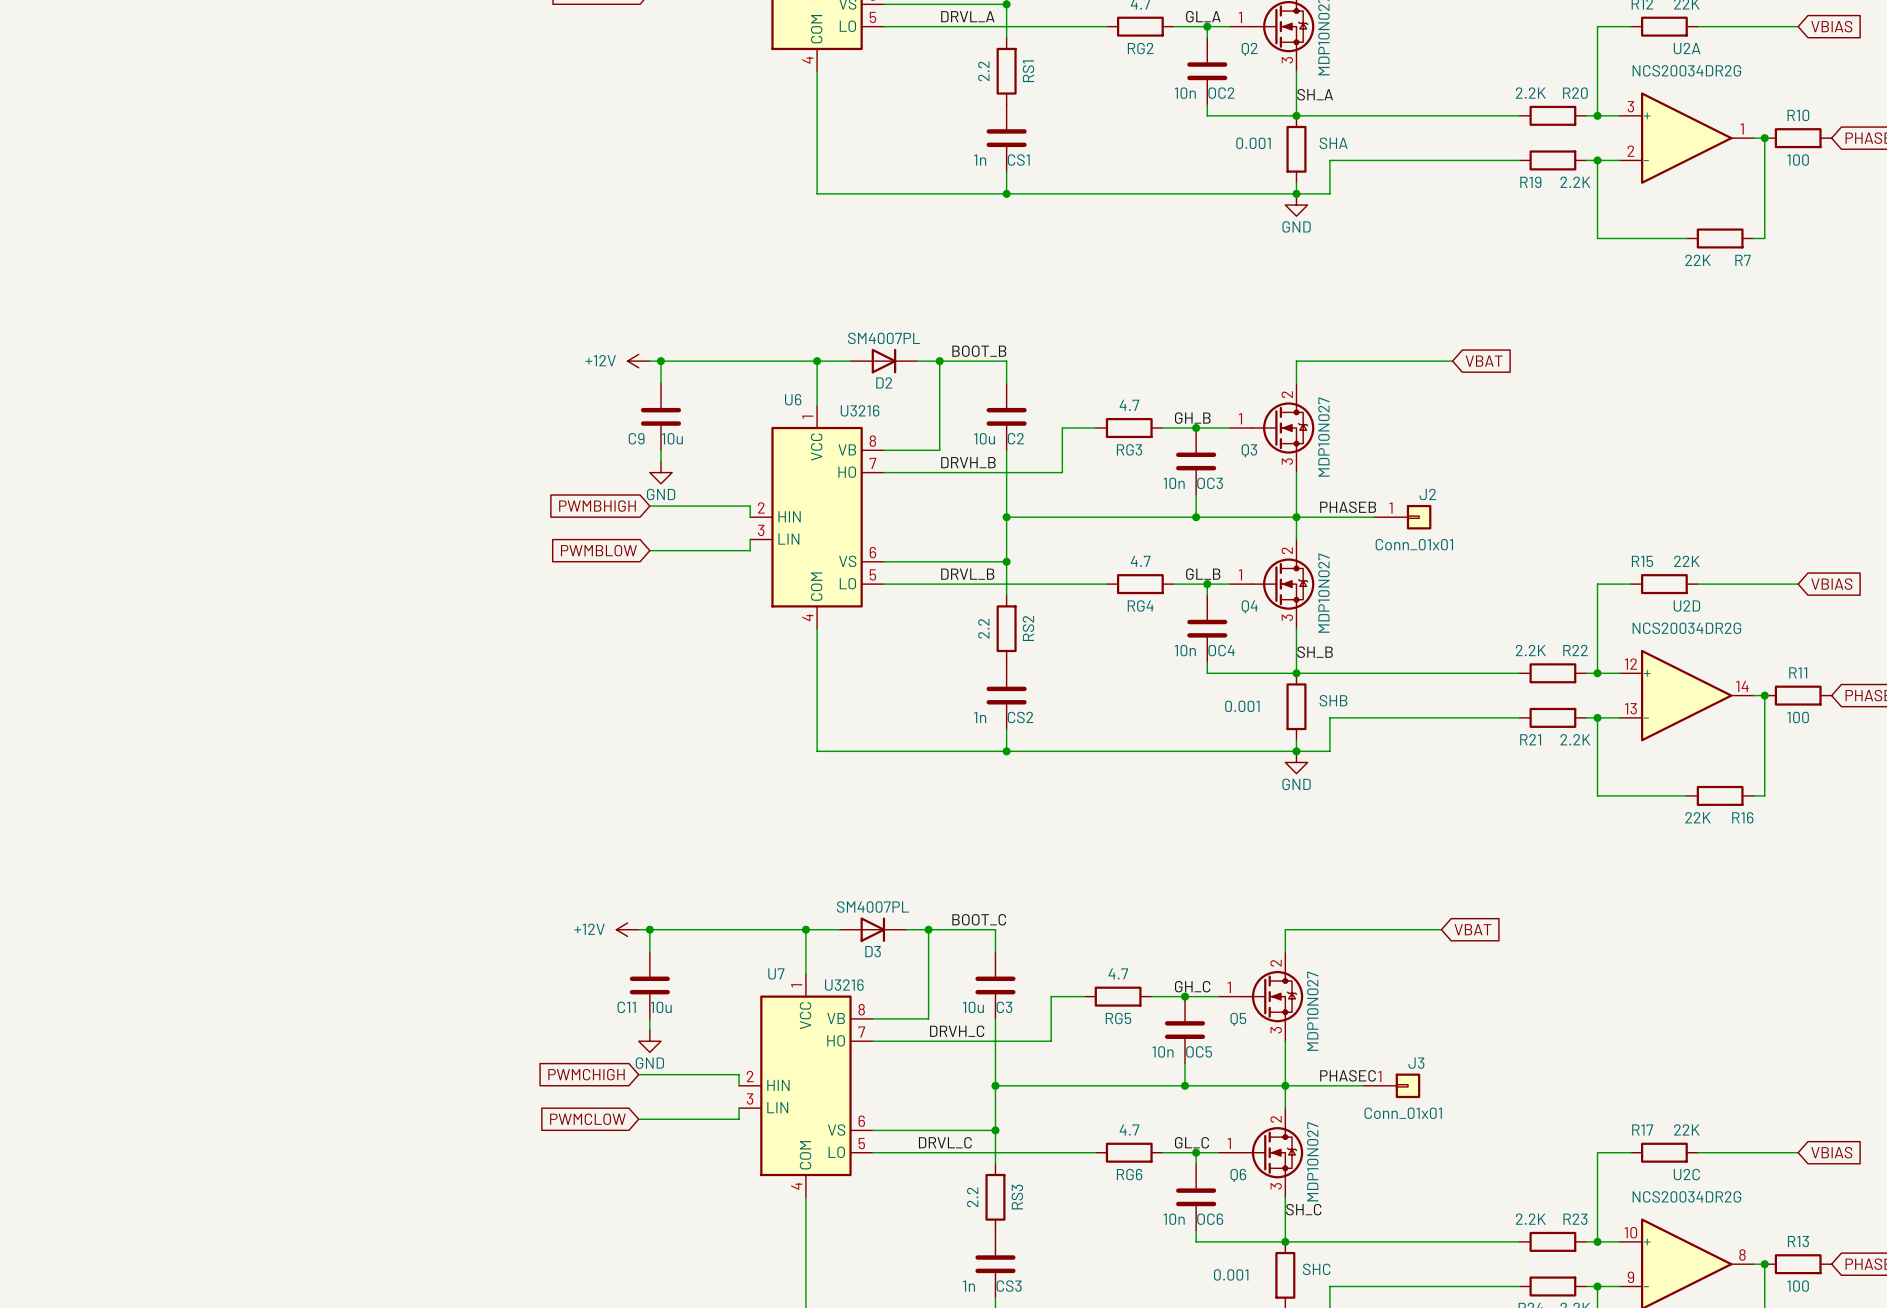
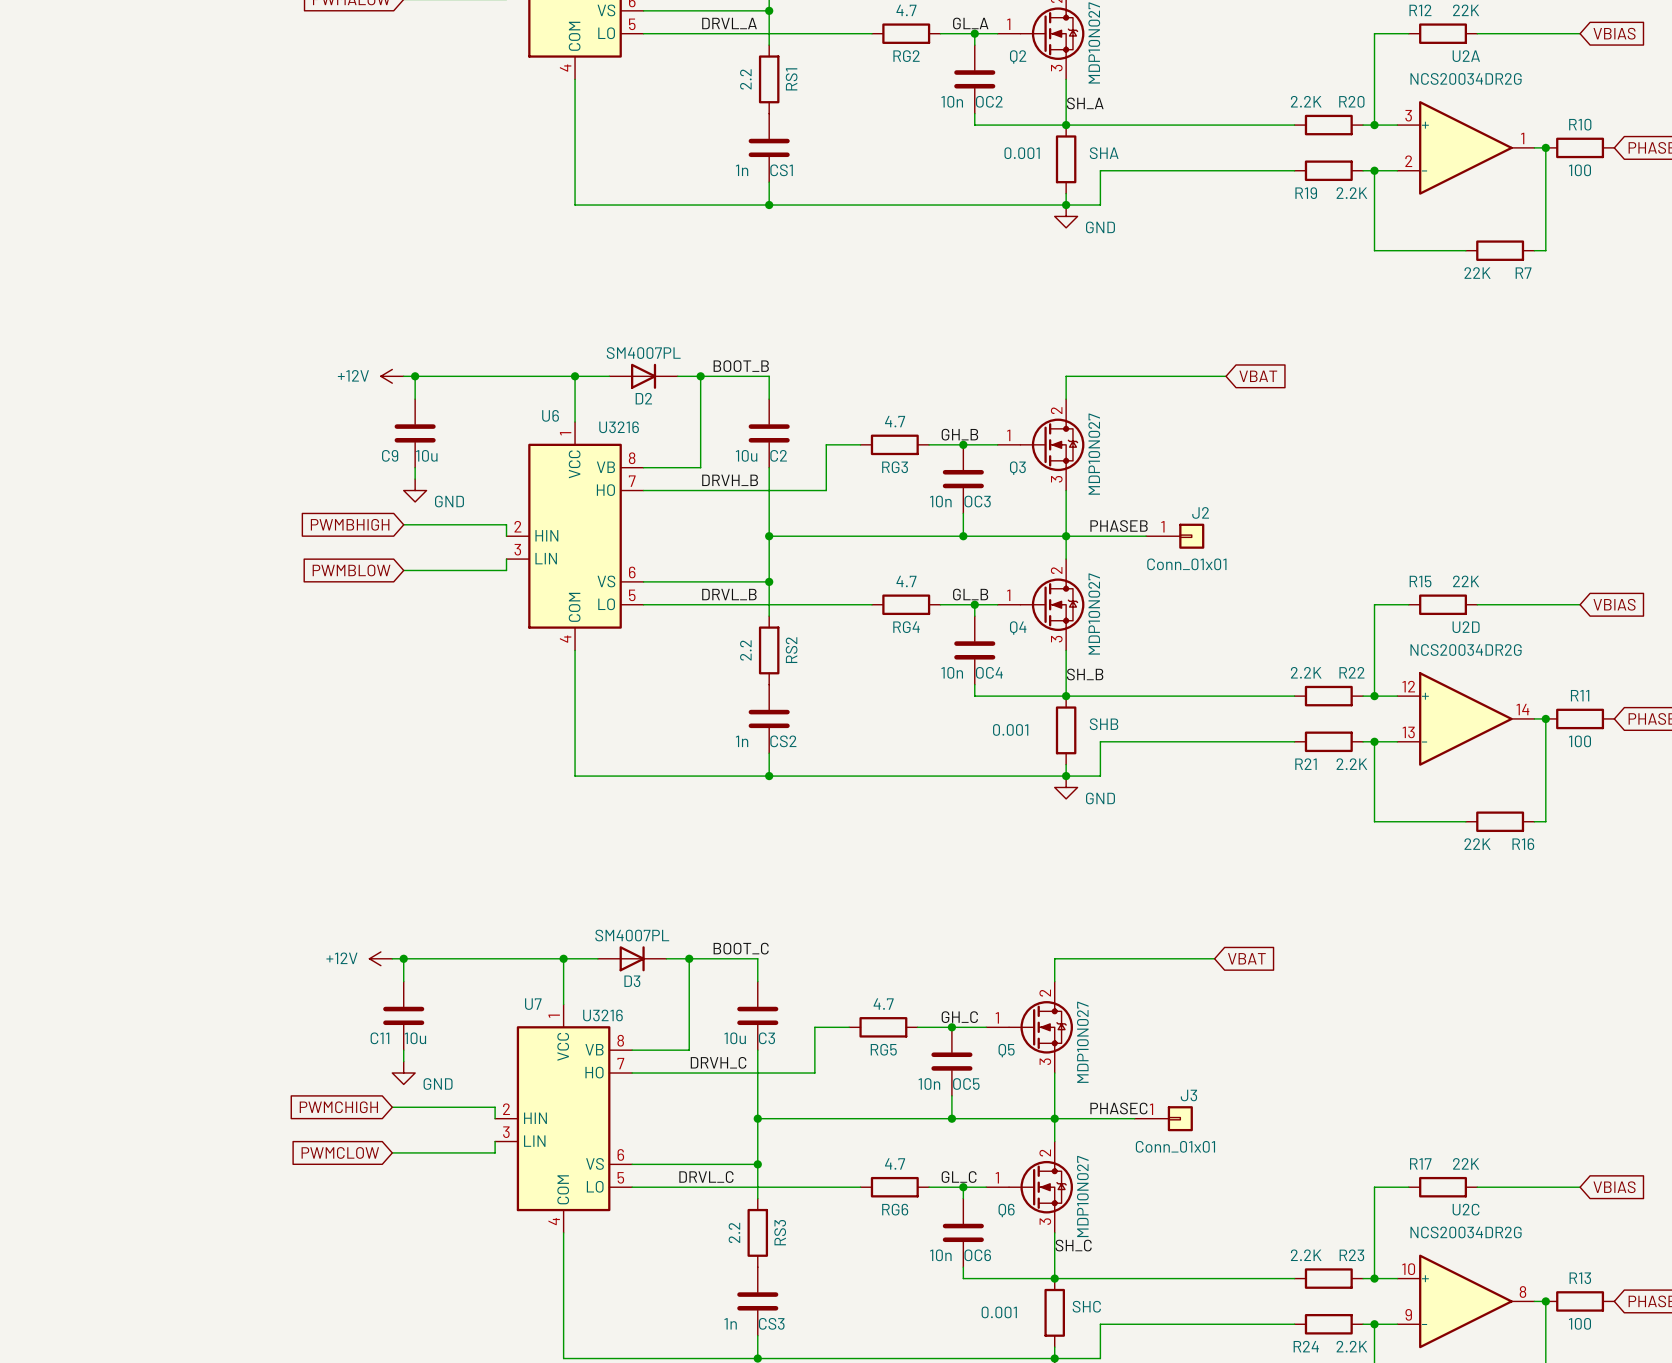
power symbol text position: GND (1296, 226) -> GND (1100, 227)
power symbol text position: GND (661, 494) -> GND (449, 501)
power symbol text position: GND (1296, 784) -> GND (1100, 798)
power symbol text position: GND (649, 1063) -> GND (438, 1084)

